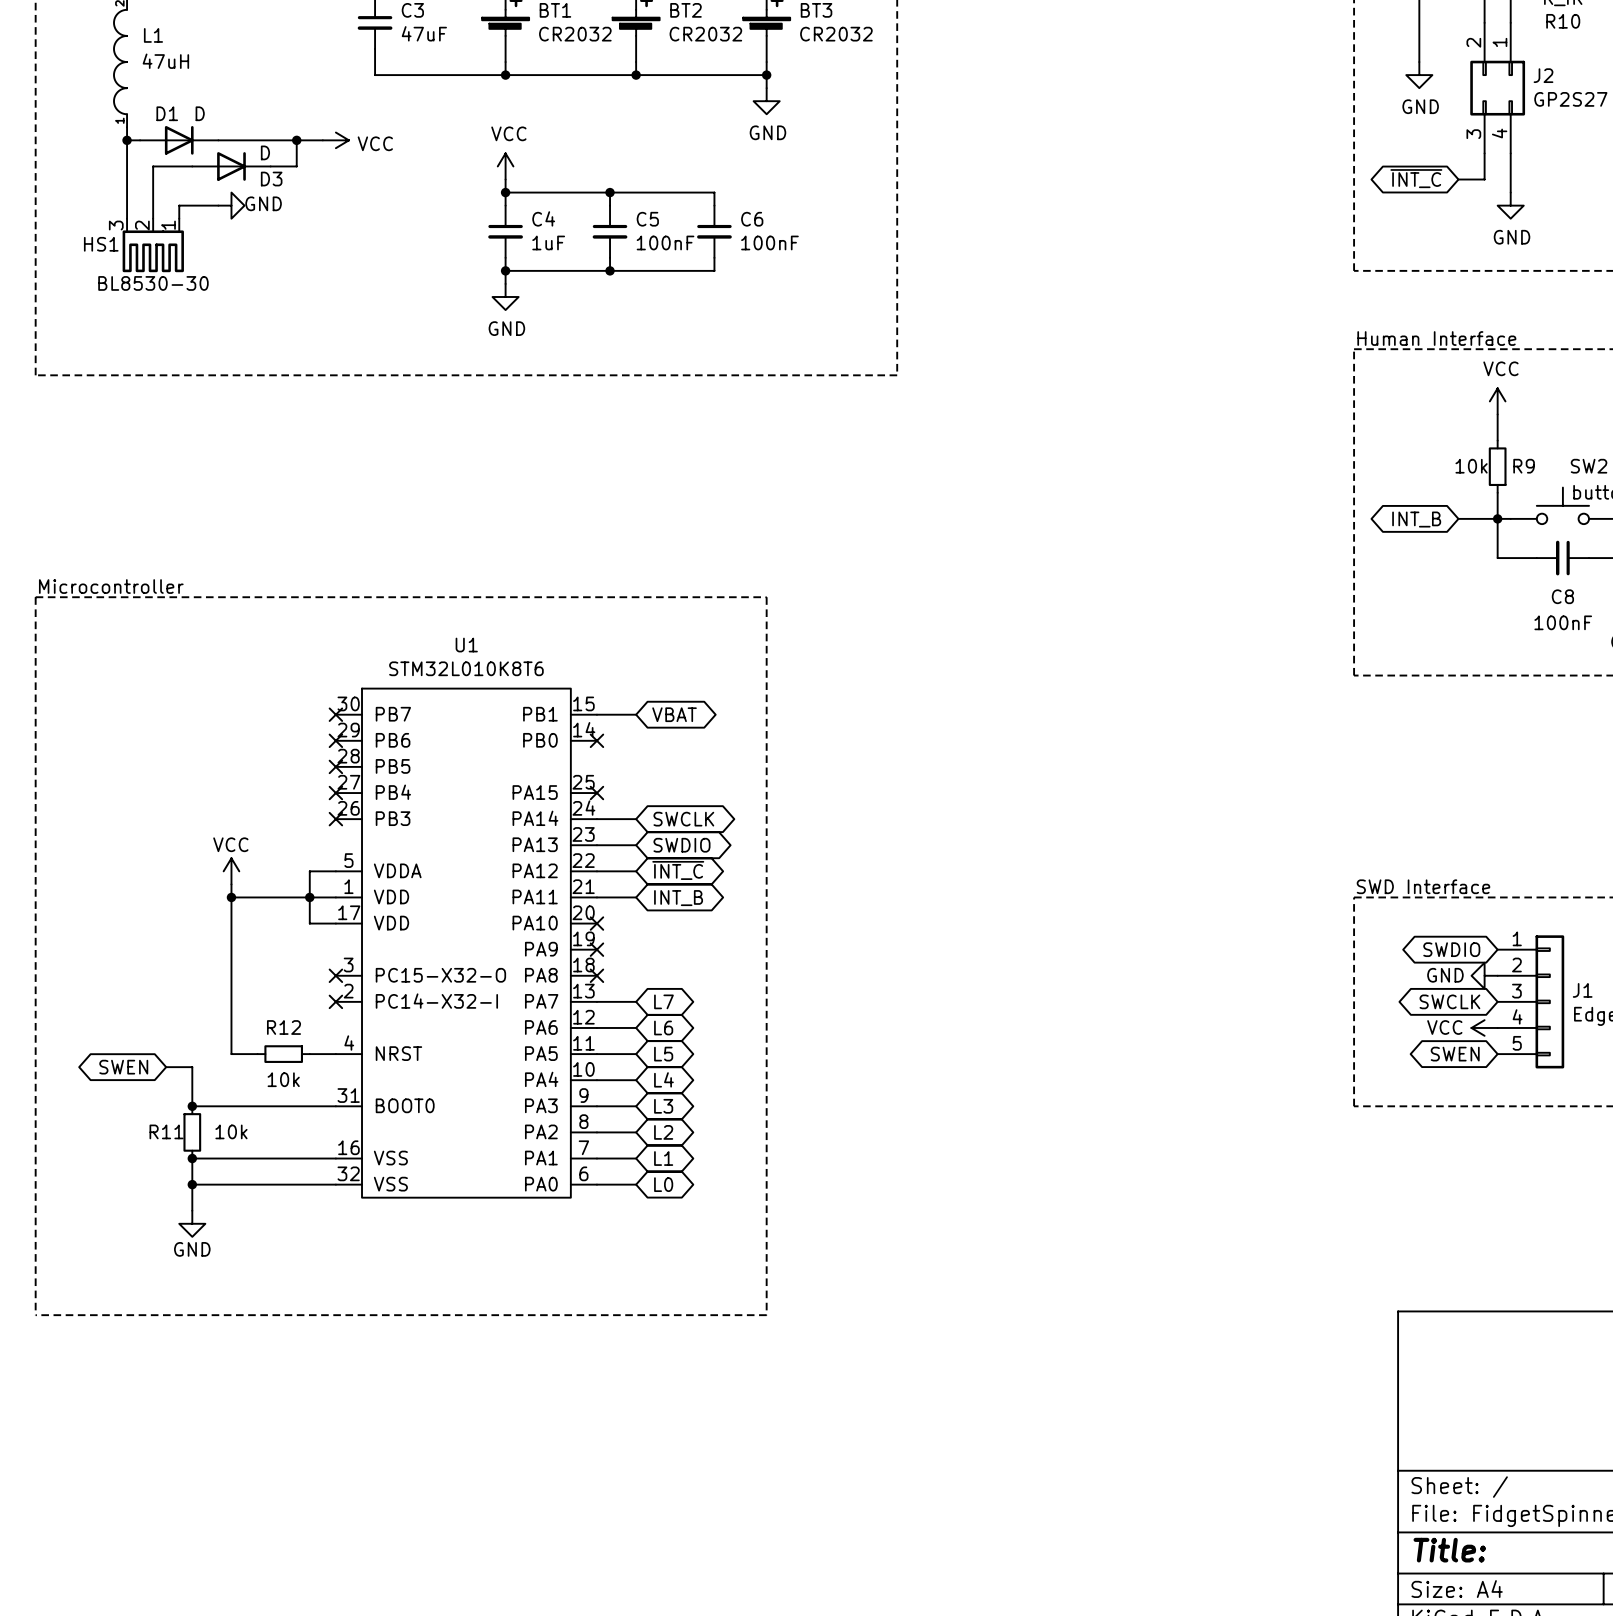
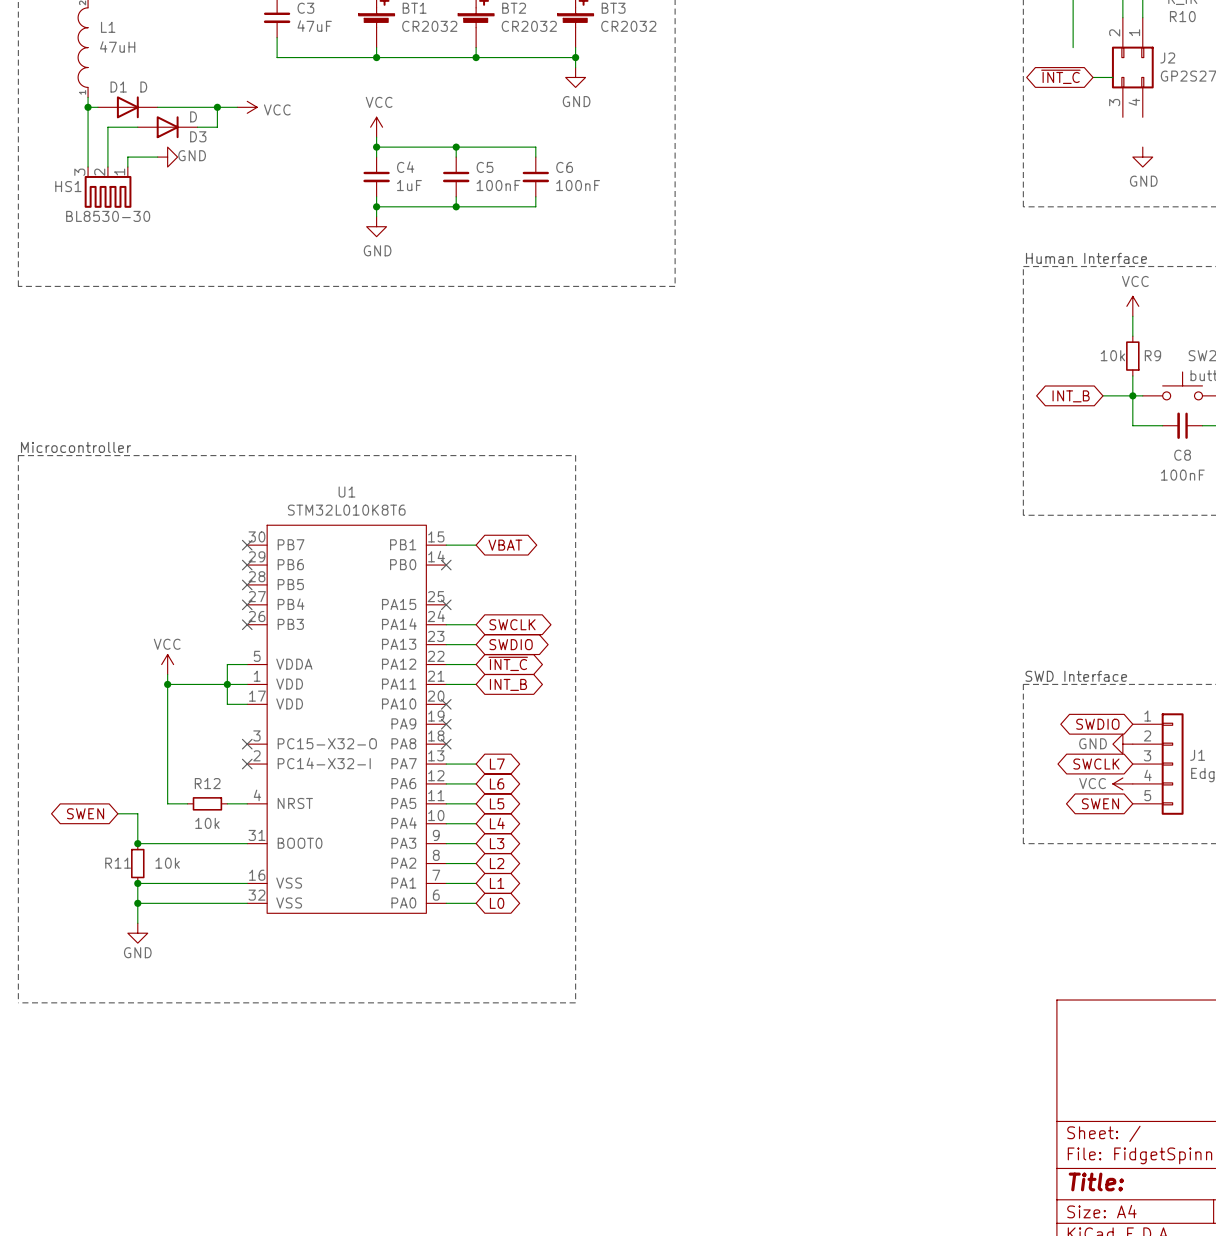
power symbol: GND (1419, 75) -> none
wire: none -> (1093, 77) (1112, 77)
wire: (1484, 153) (1484, 179) (1458, 179) -> none
wire: (1510, 153) (1510, 192) -> none
global label position: ~{INT_C} (1416, 178) -> ~{INT_C} (1060, 76)

